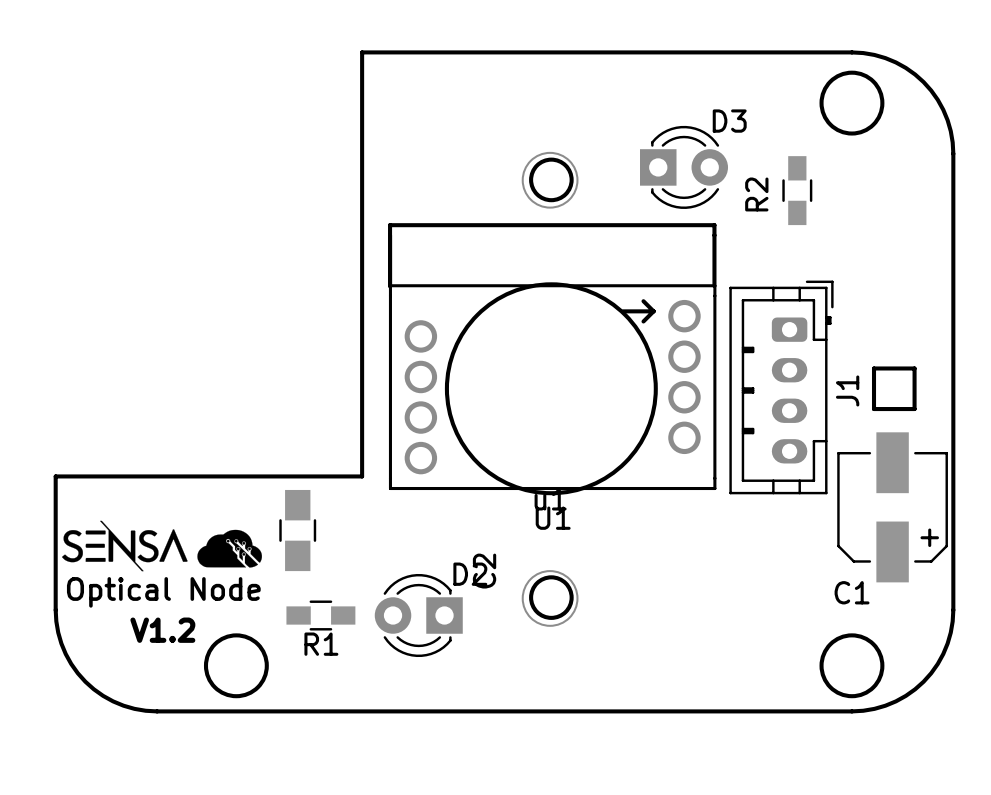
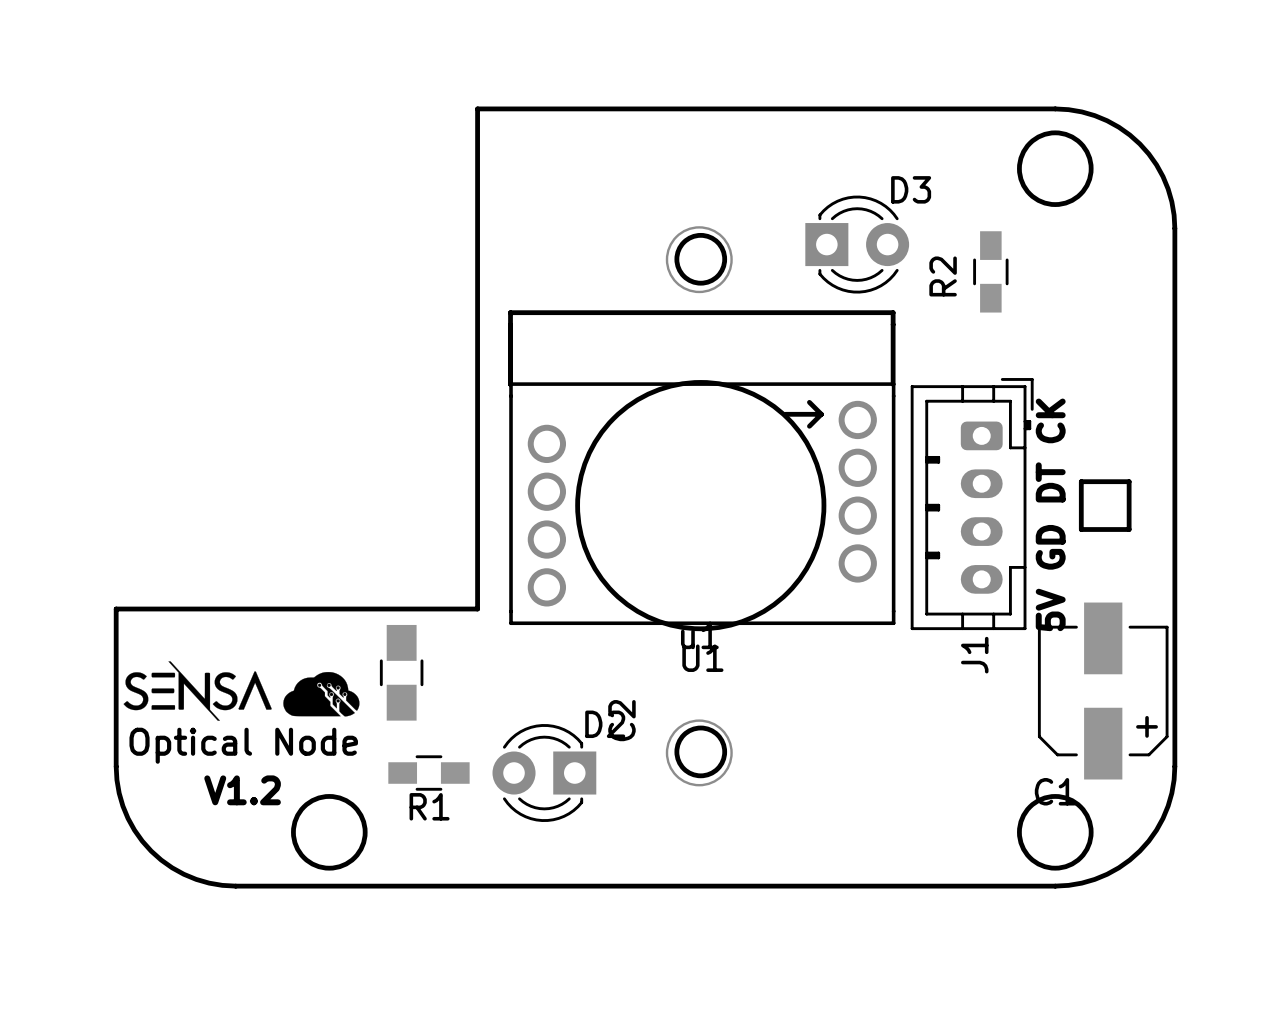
J1 name position: J1 (847, 390) -> J1 (974, 655)
text: none -> 5V GD DT CK (1050, 514)
C1 position: (892, 507) -> (1103, 691)

